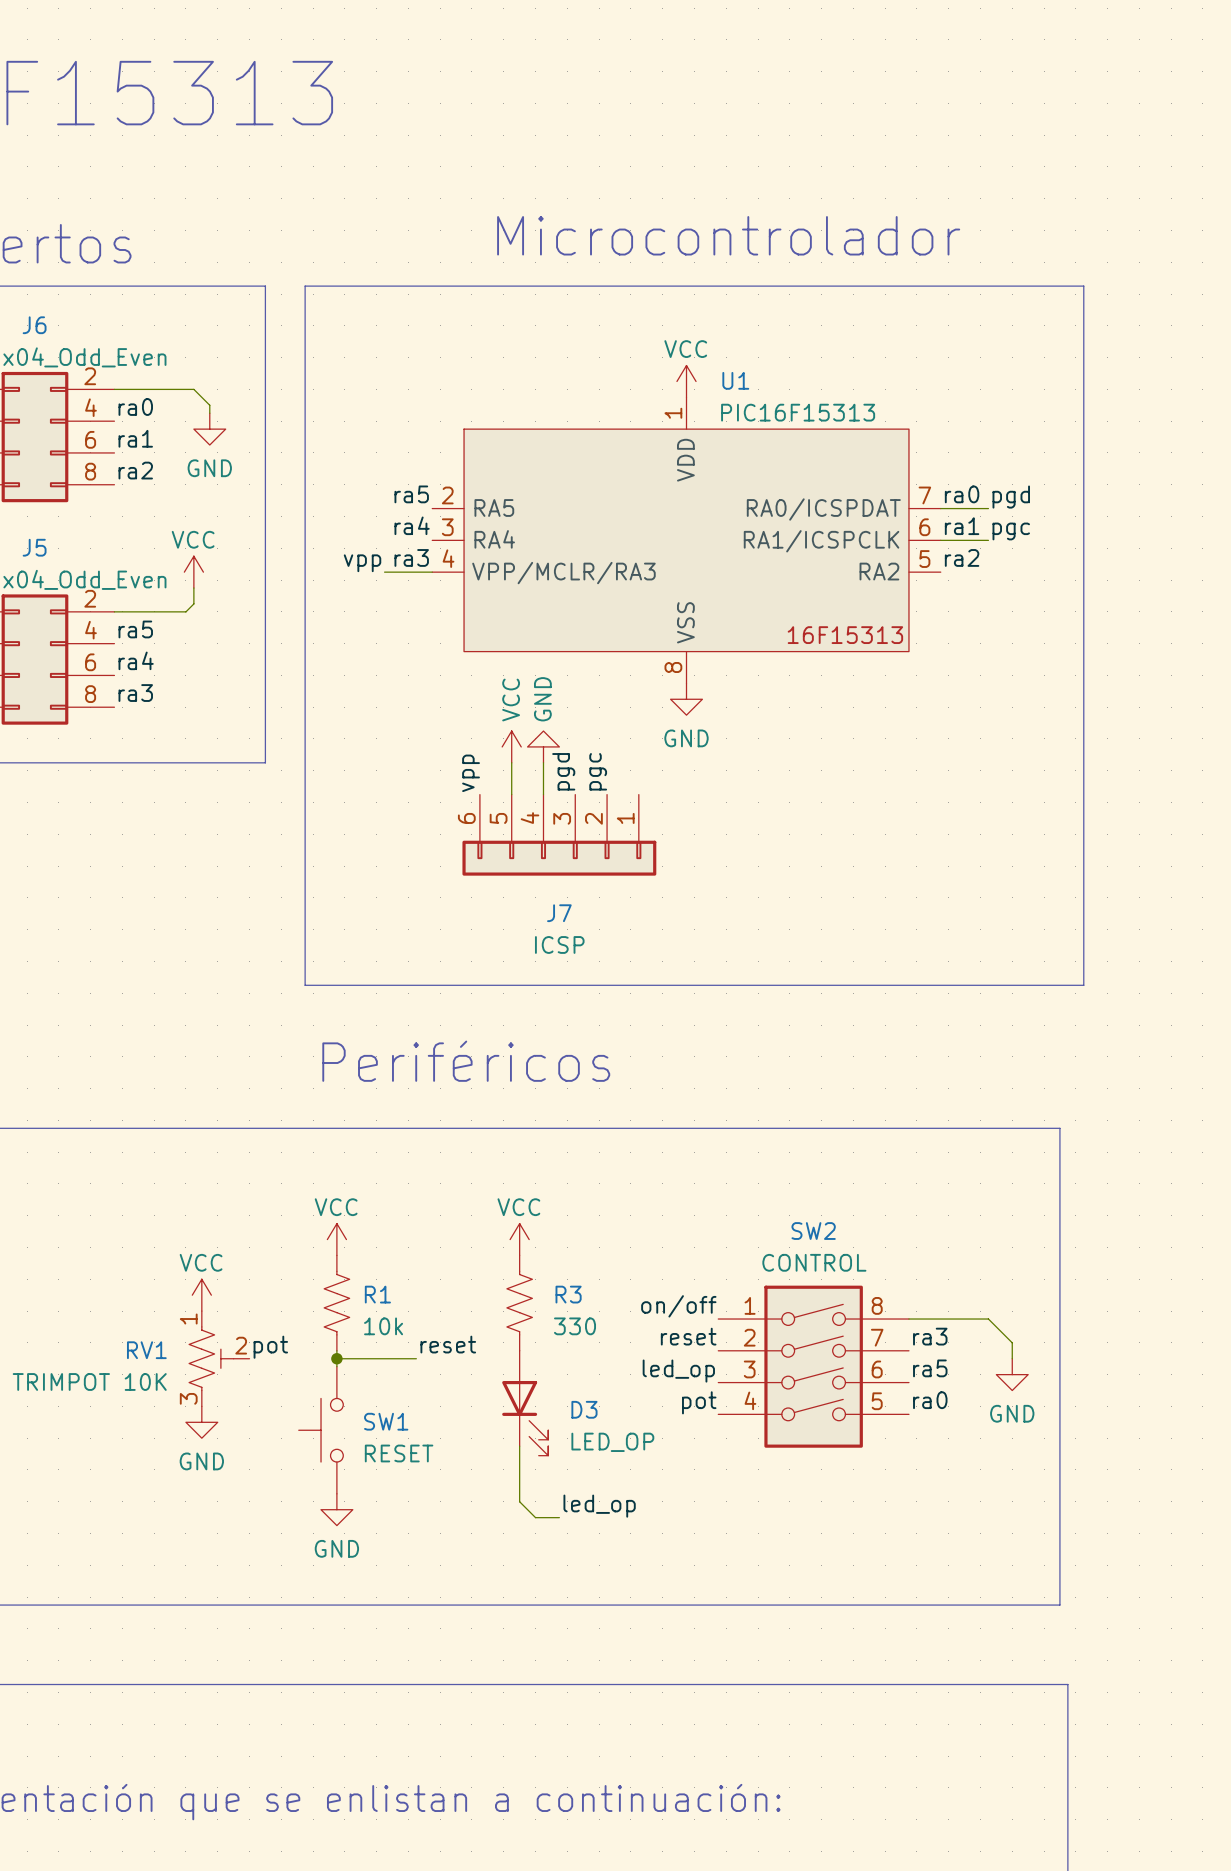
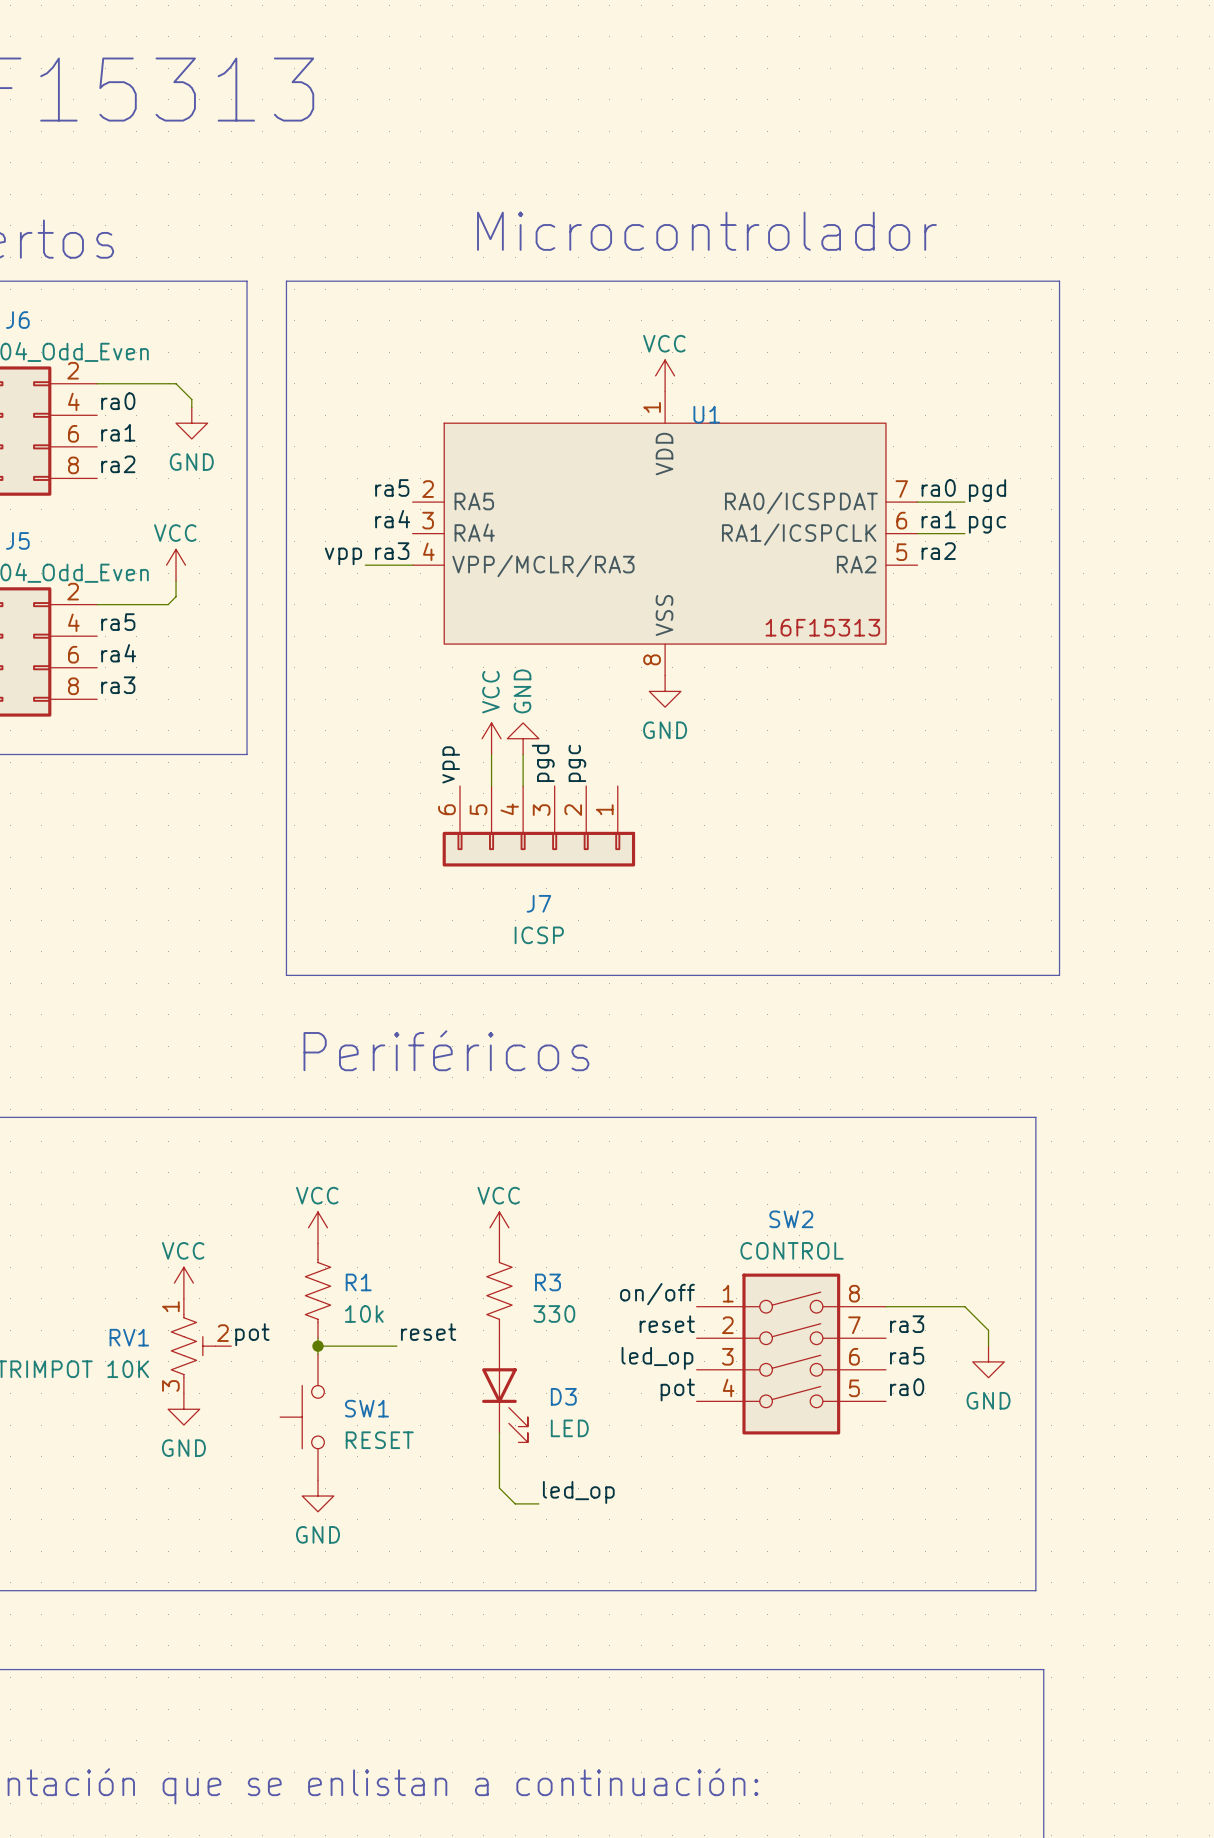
U1 name position: U1 (735, 380) -> U1 (706, 414)
U1 value: PIC16F15313 (798, 412) -> none
D3 value: LED_OP (612, 1442) -> LED (569, 1428)

